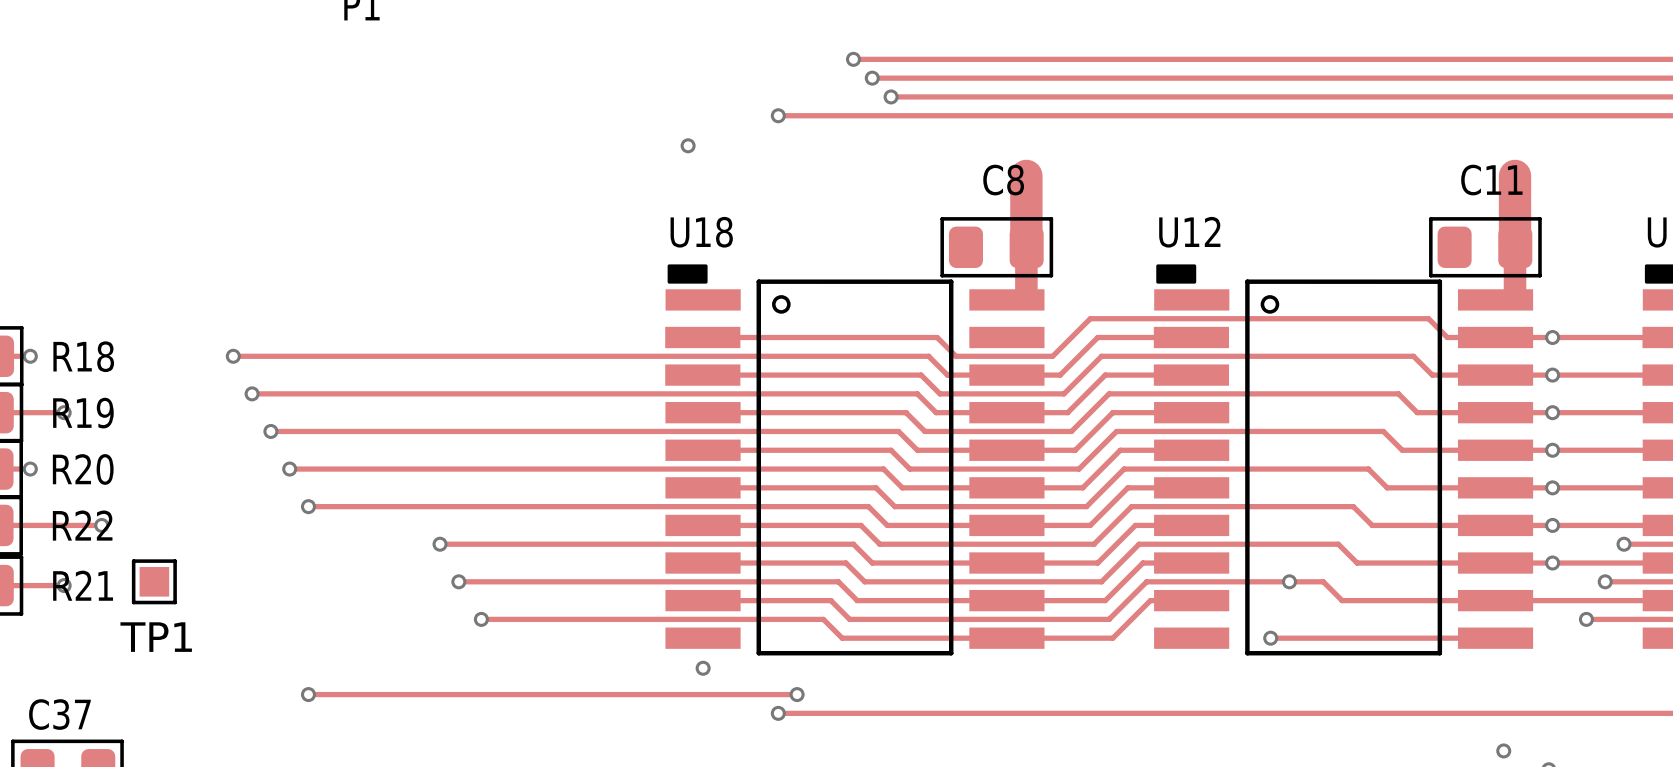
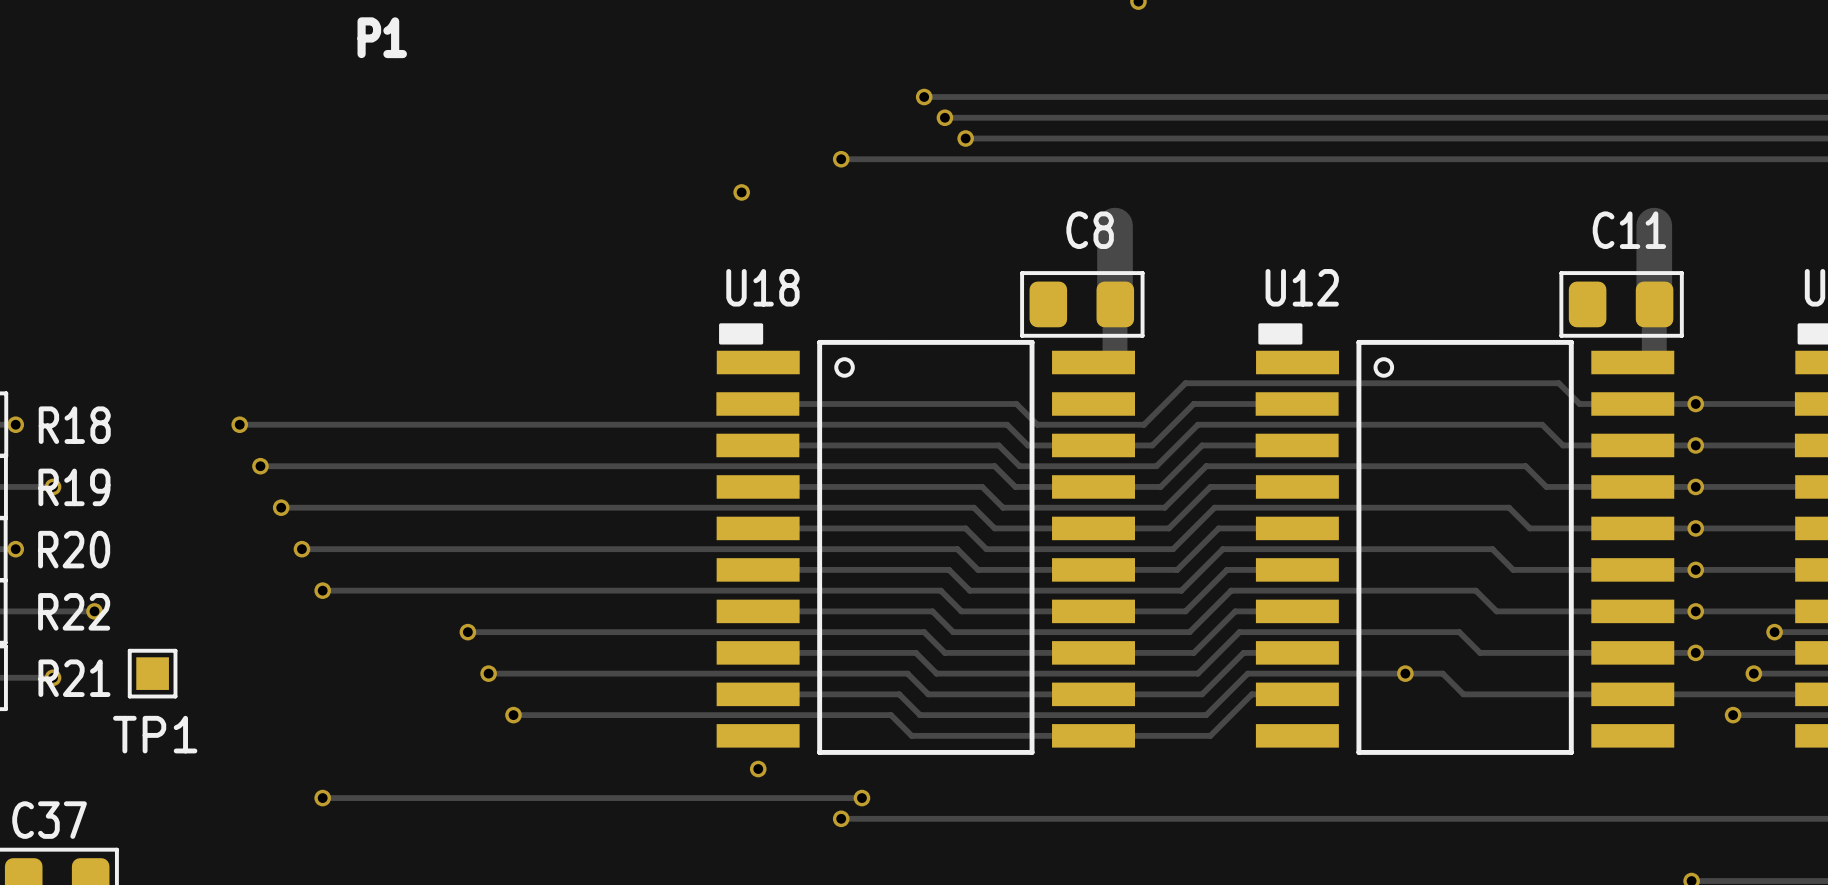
track: (1270, 638) (1495, 638) -> none
via: (1270, 638) -> none
via: (1503, 750) -> none

